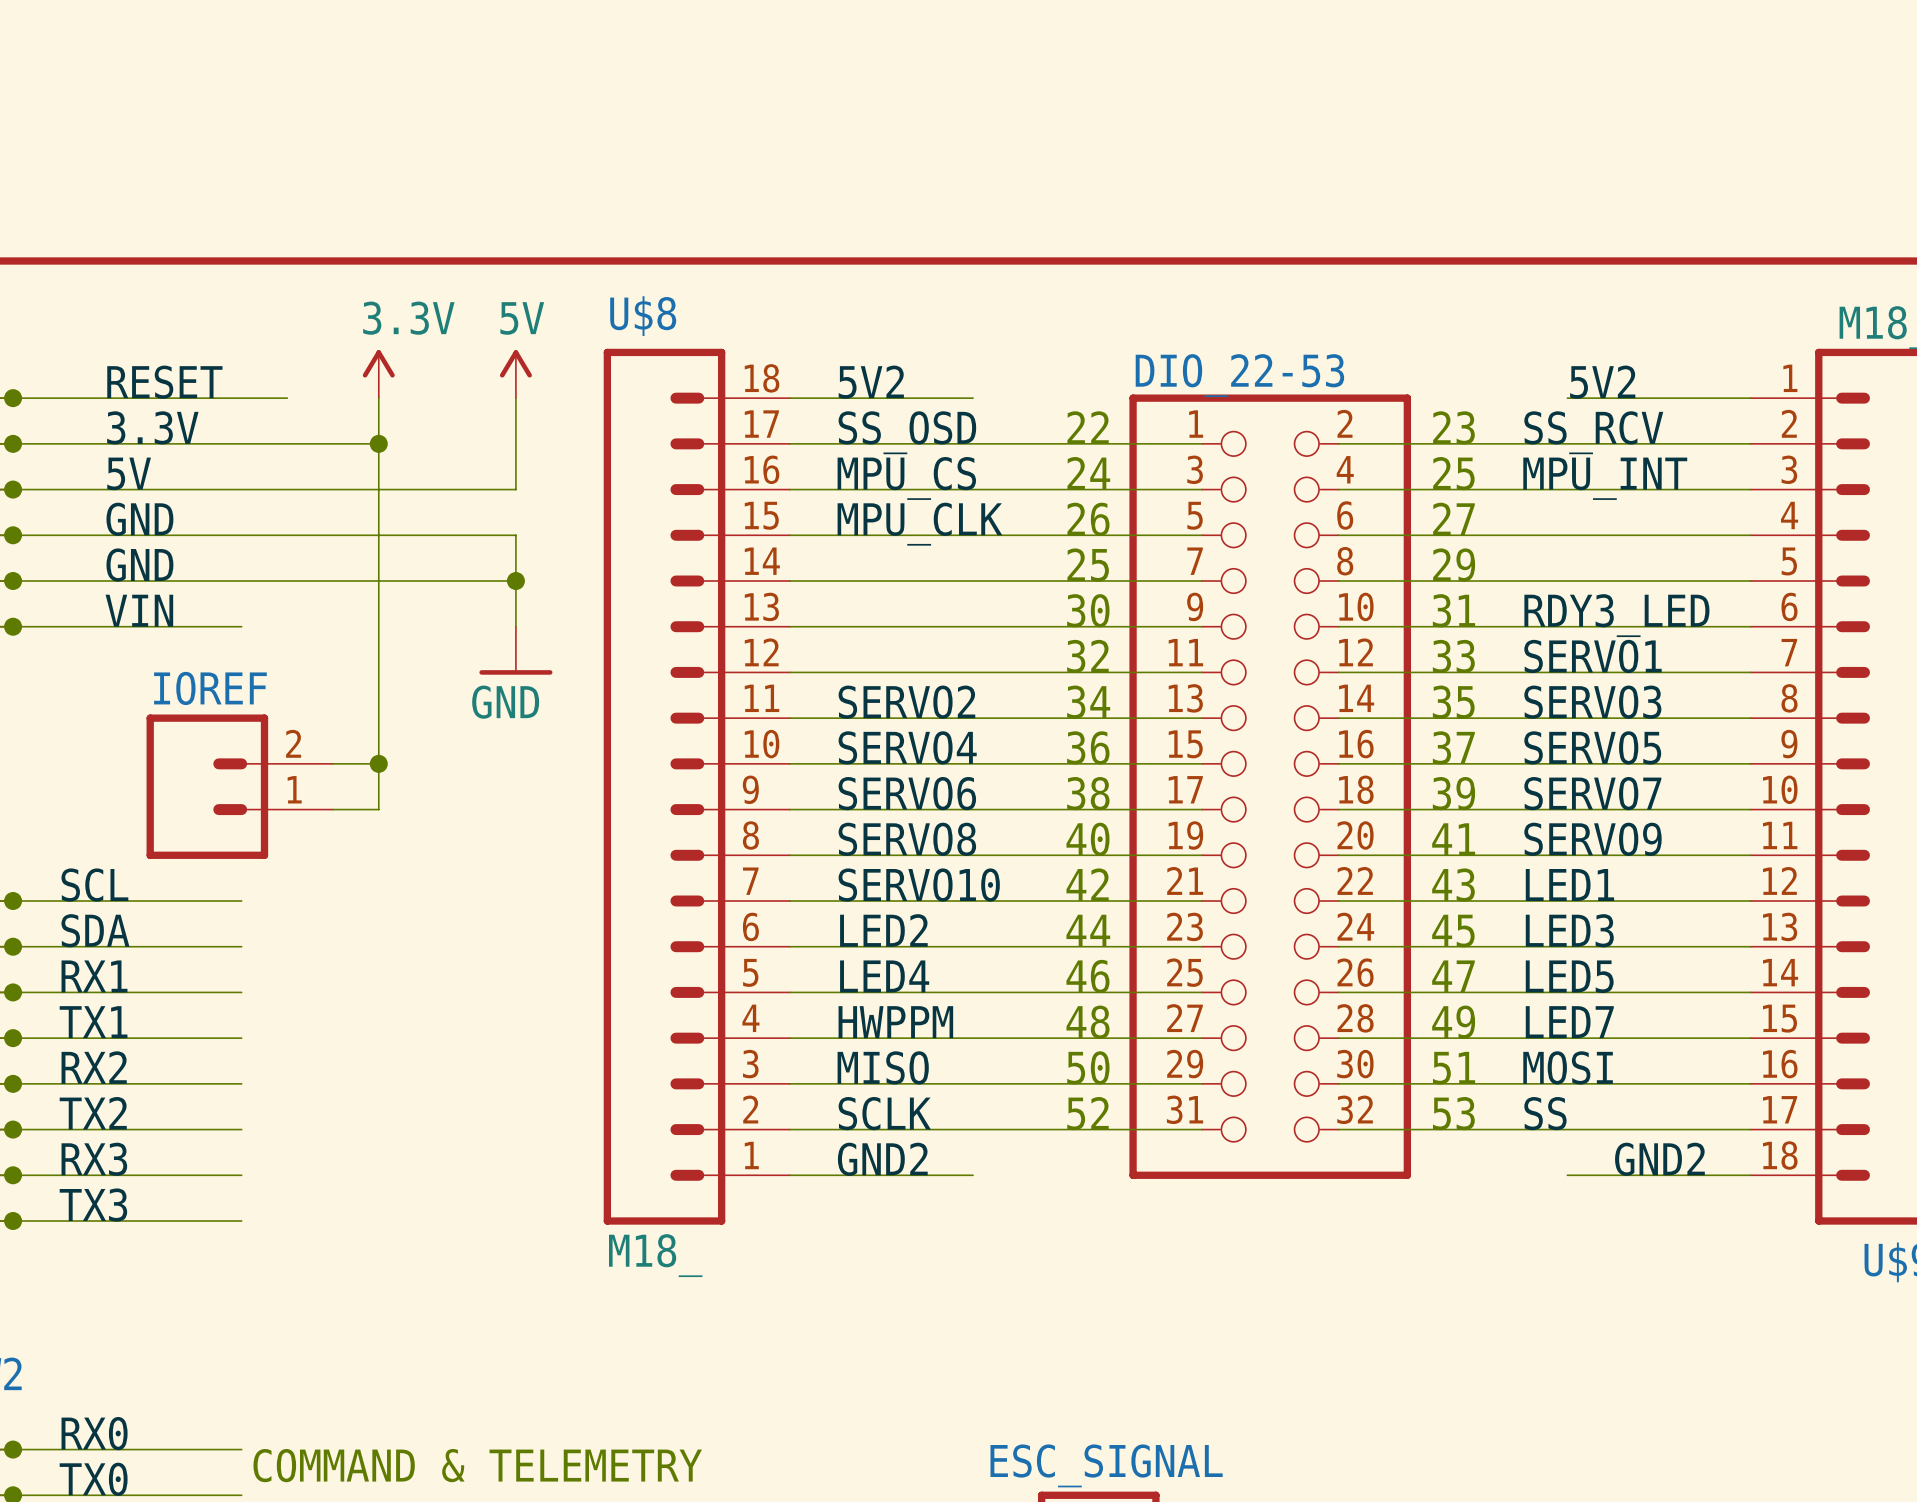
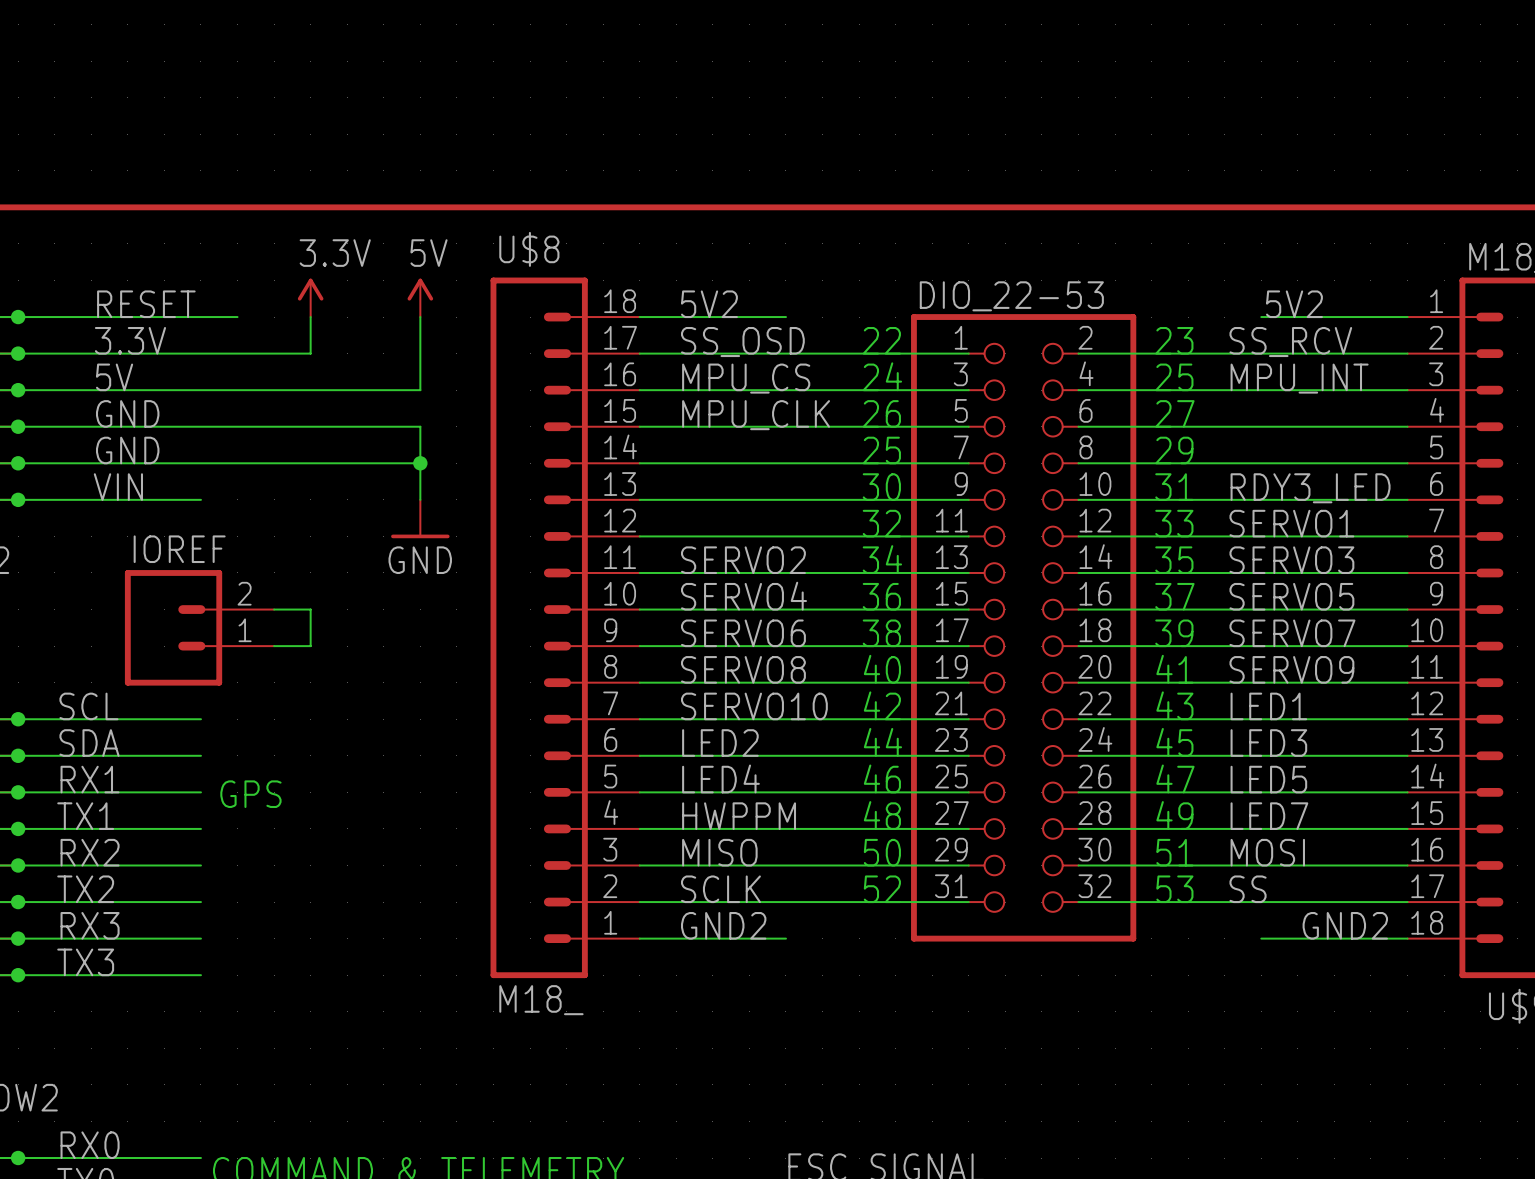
wire: (378, 443) (378, 763) -> none
junction: (378, 443) -> none
junction: (378, 763) -> none
text: none -> GPS (250, 794)

